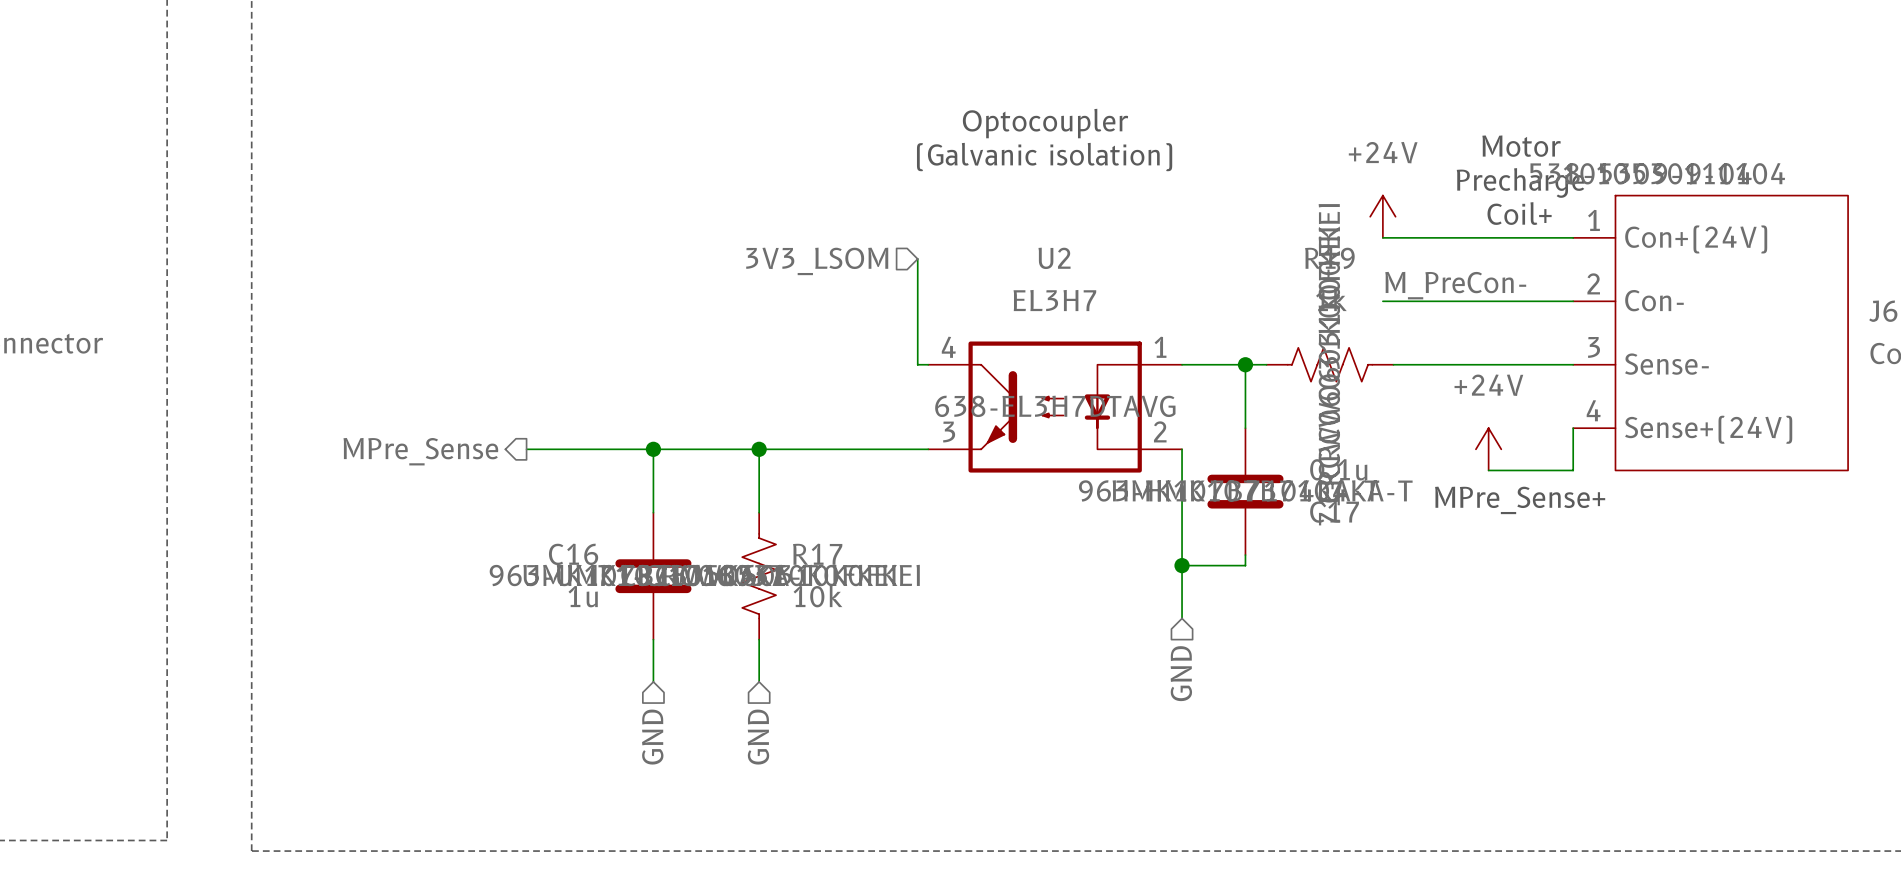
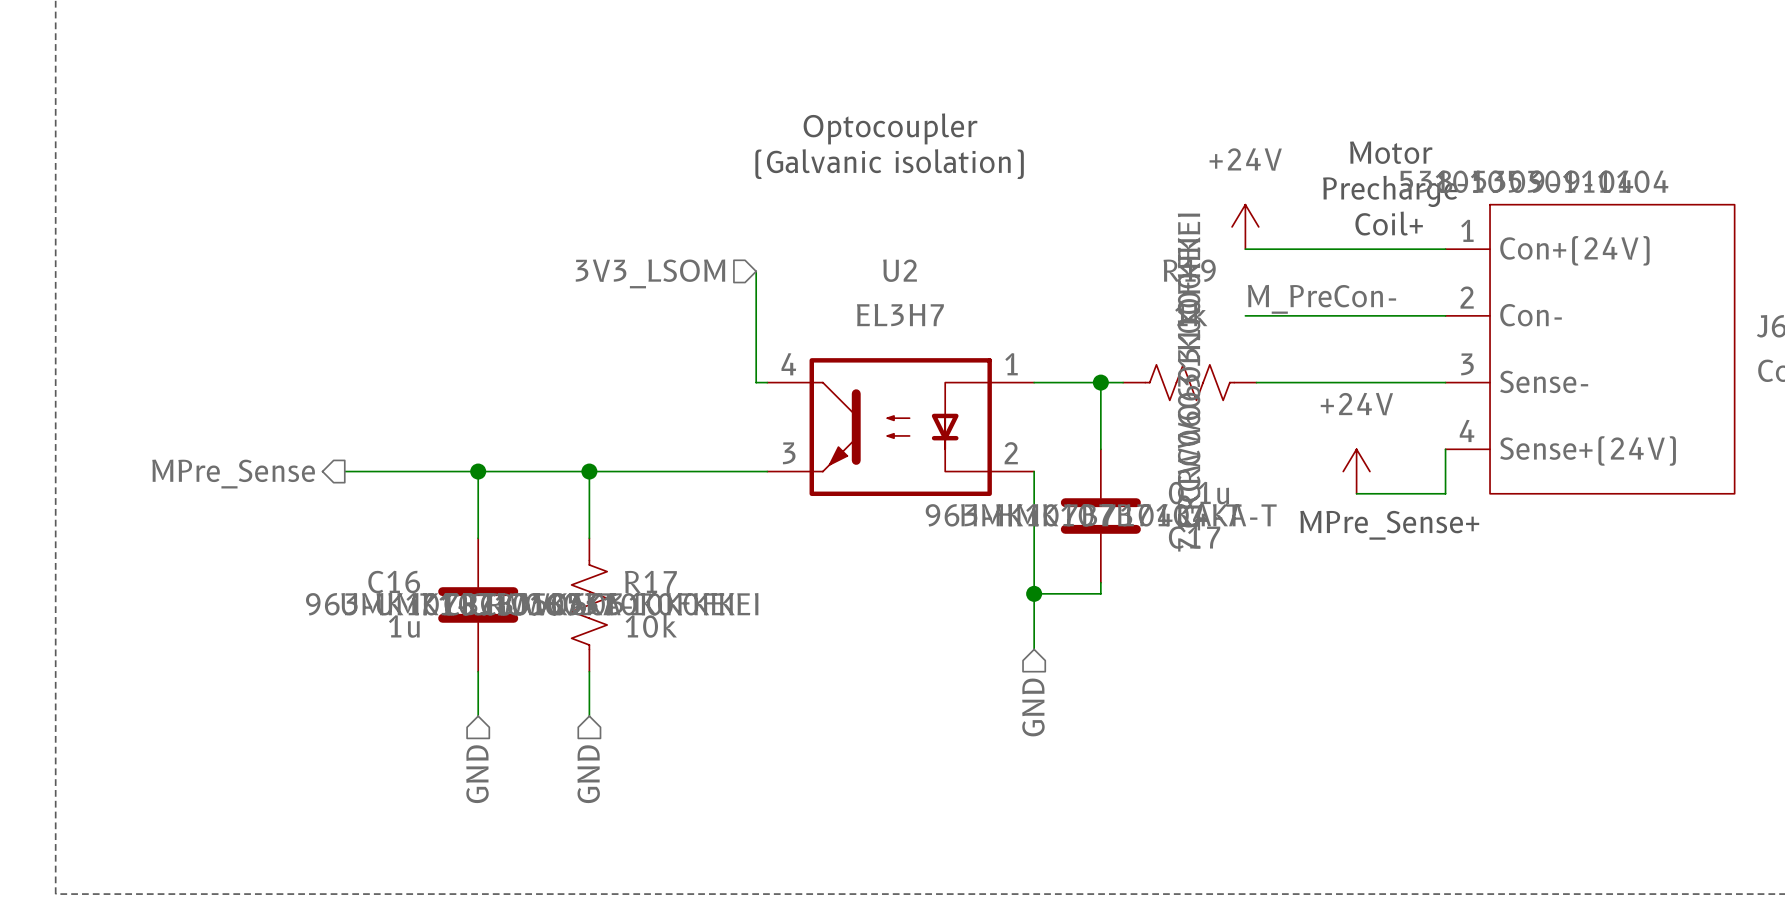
U2 text: 638-EL3H7DTAVG (1055, 406) -> none

